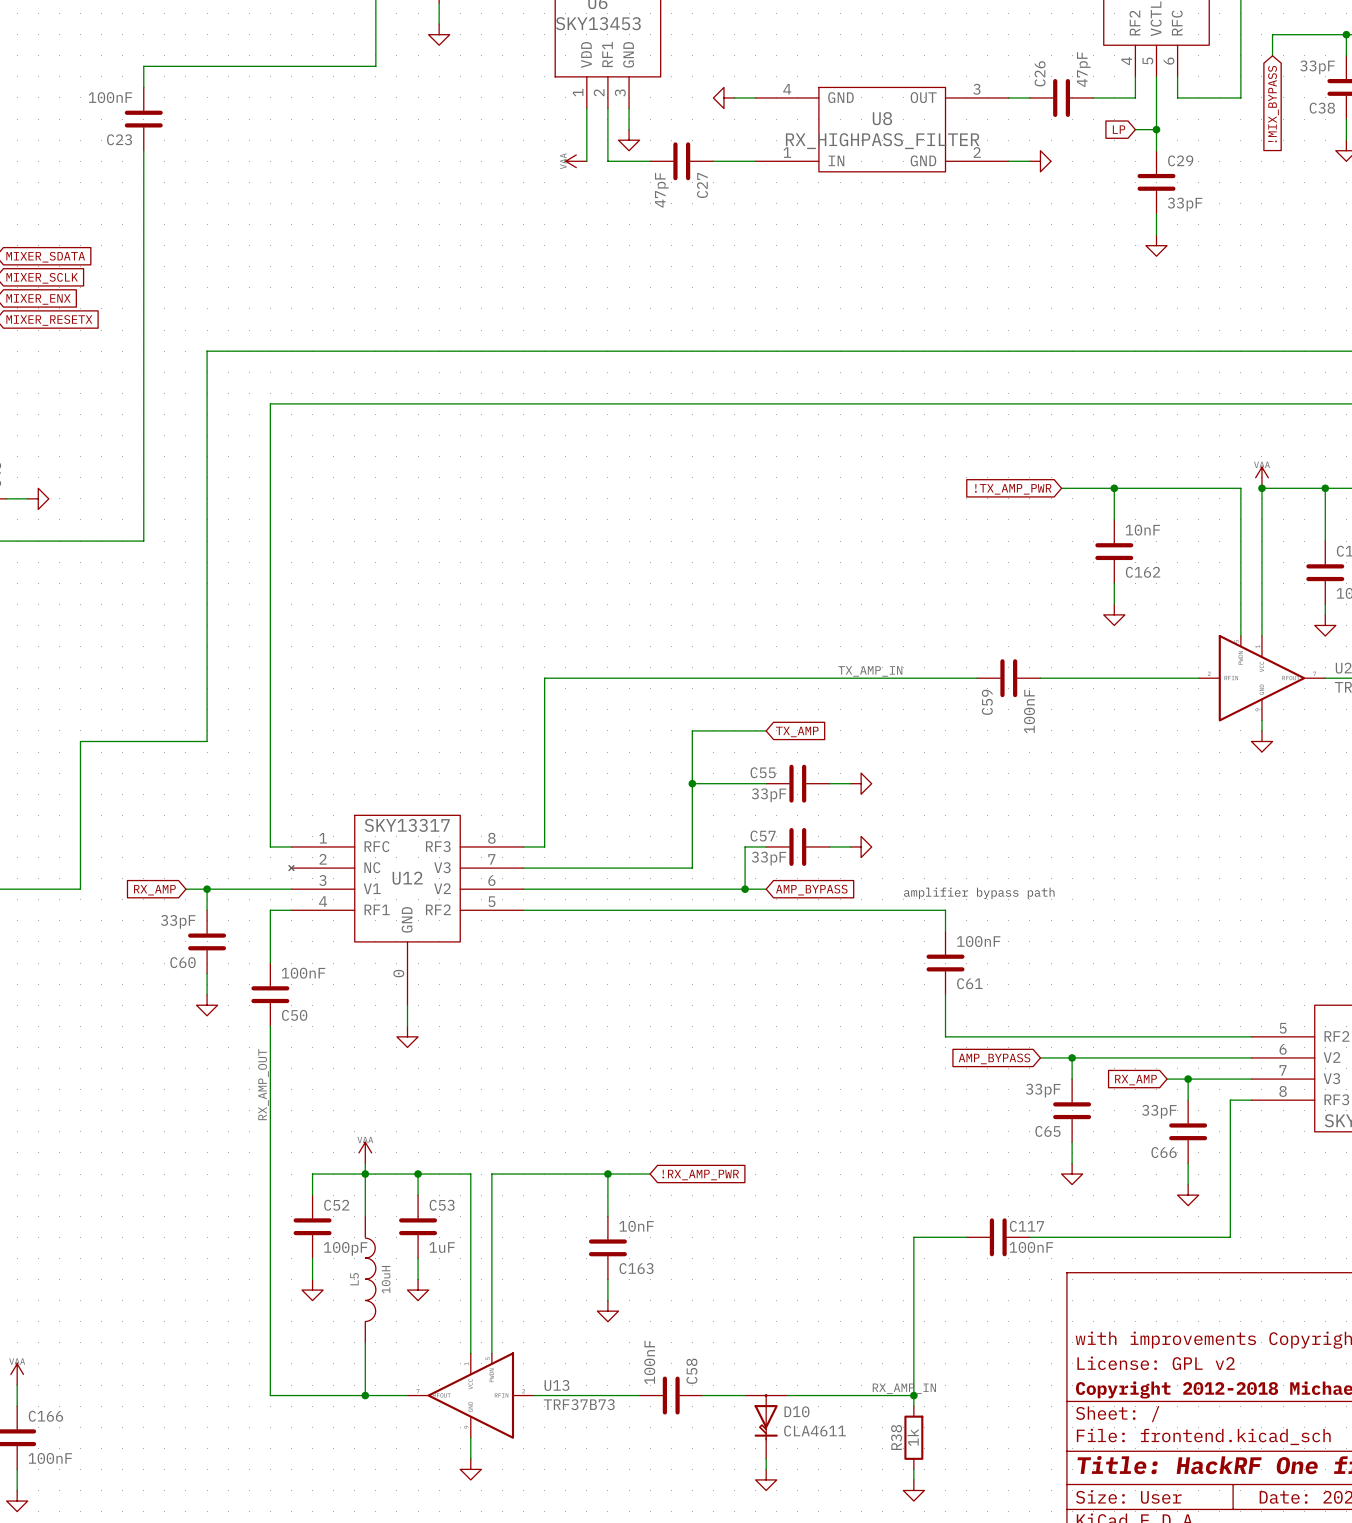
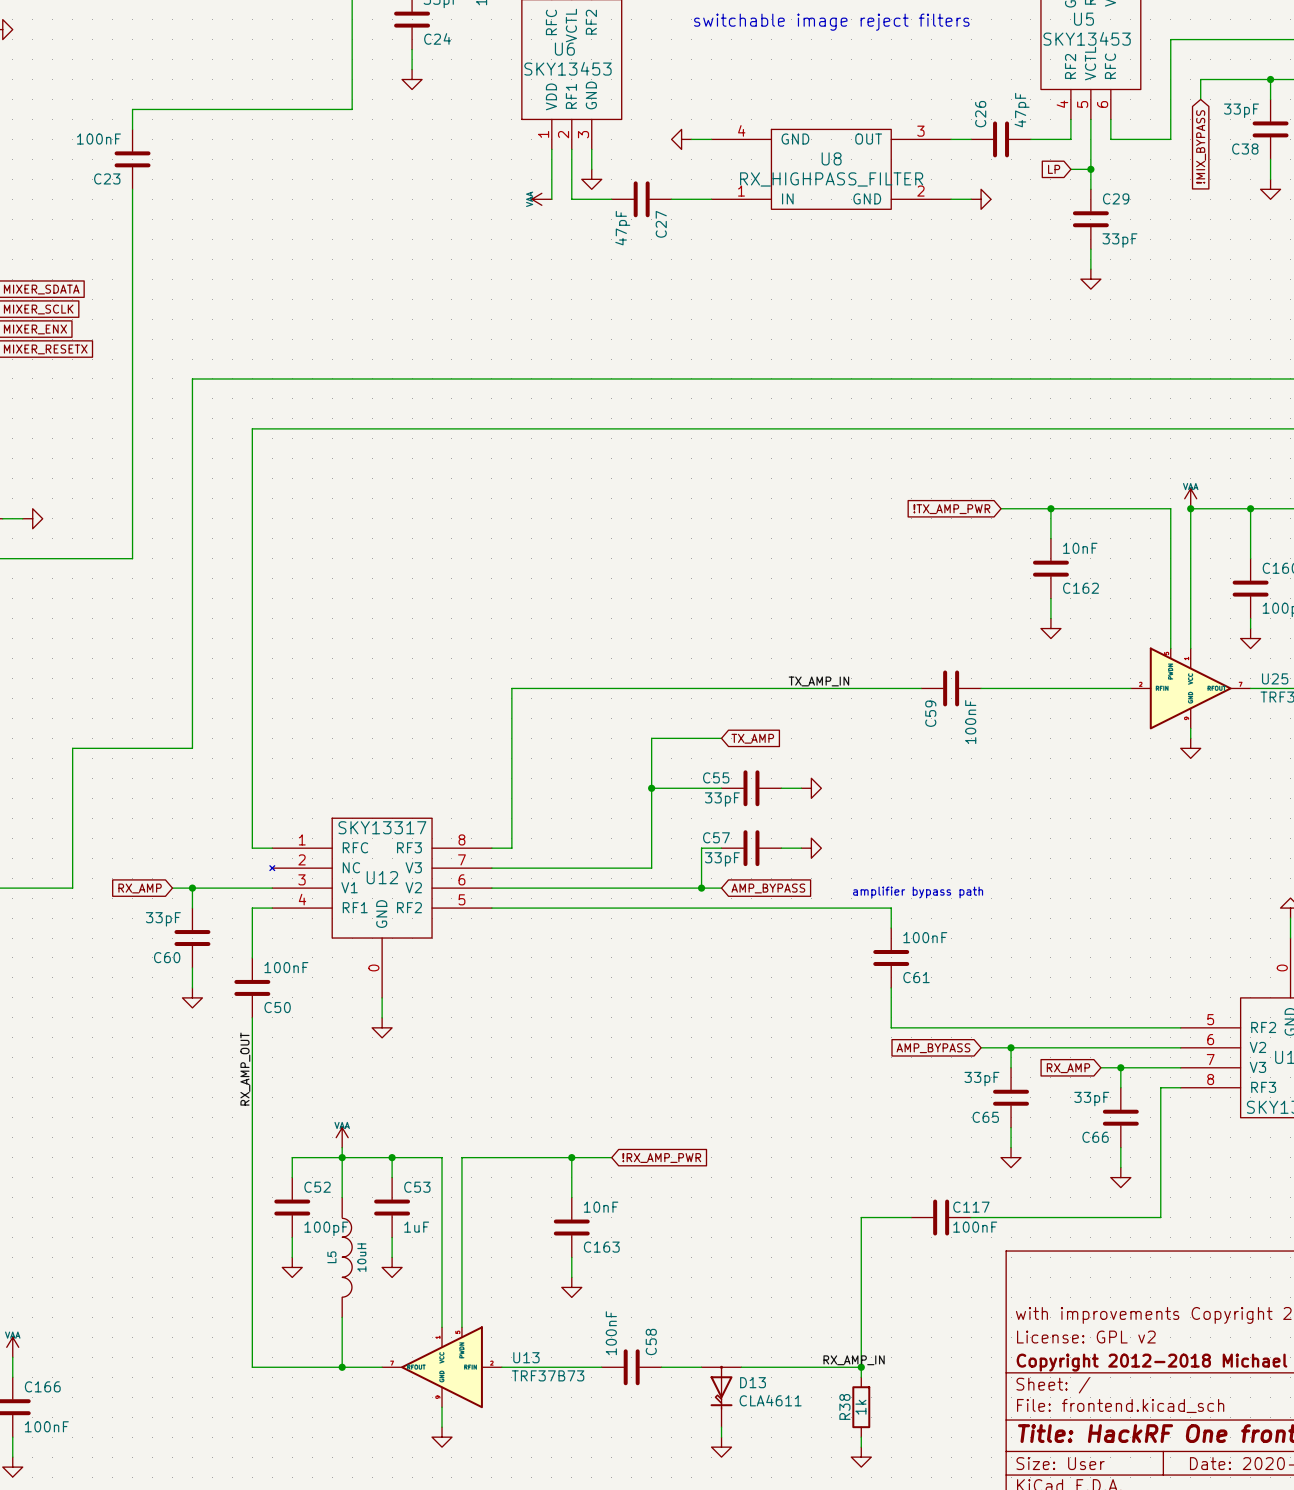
D10 name: D10 (796, 1411) -> D13 (753, 1382)

